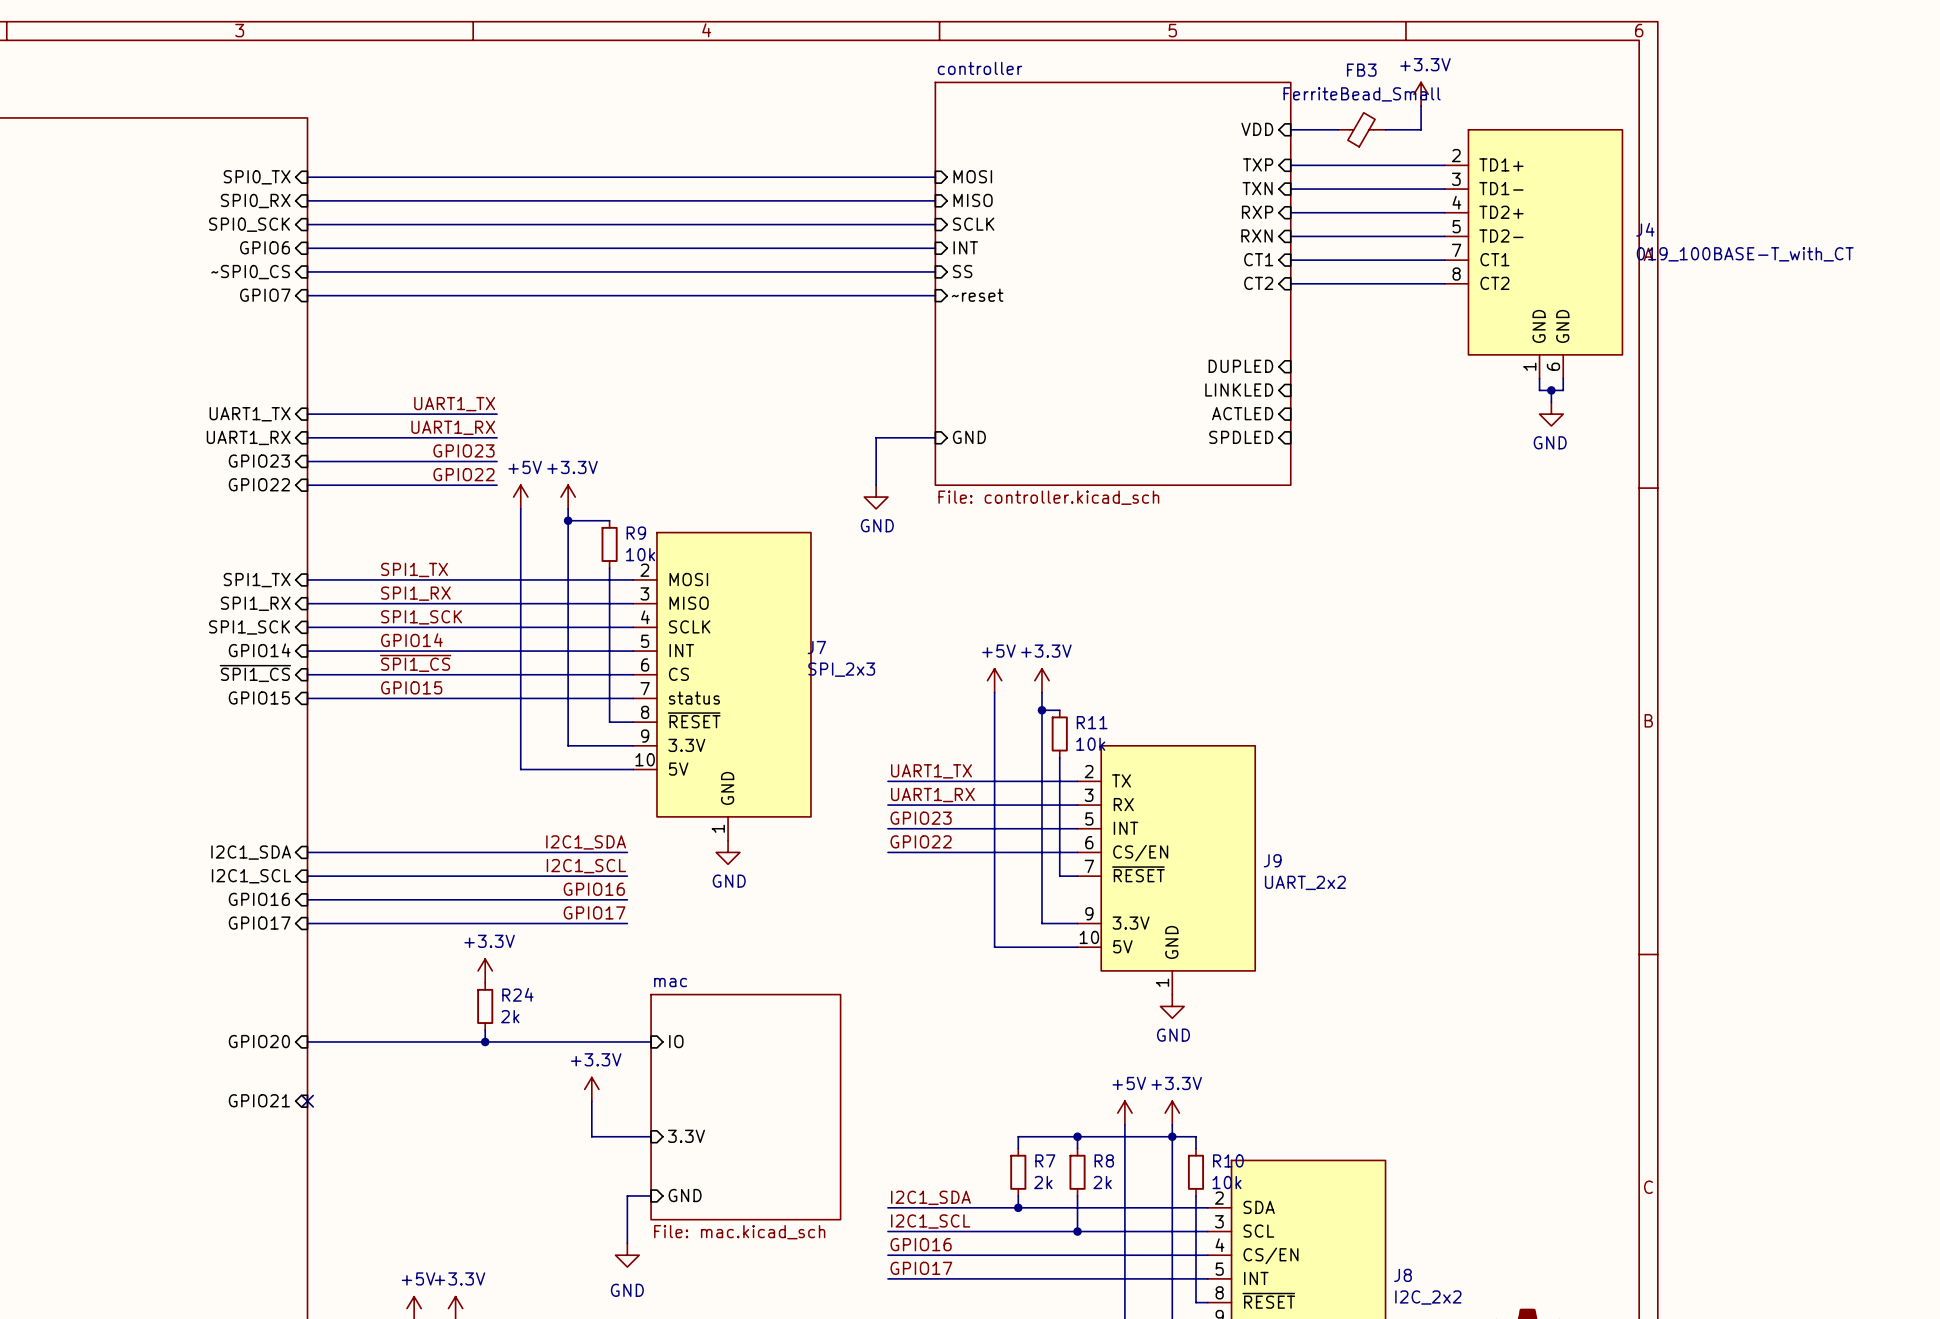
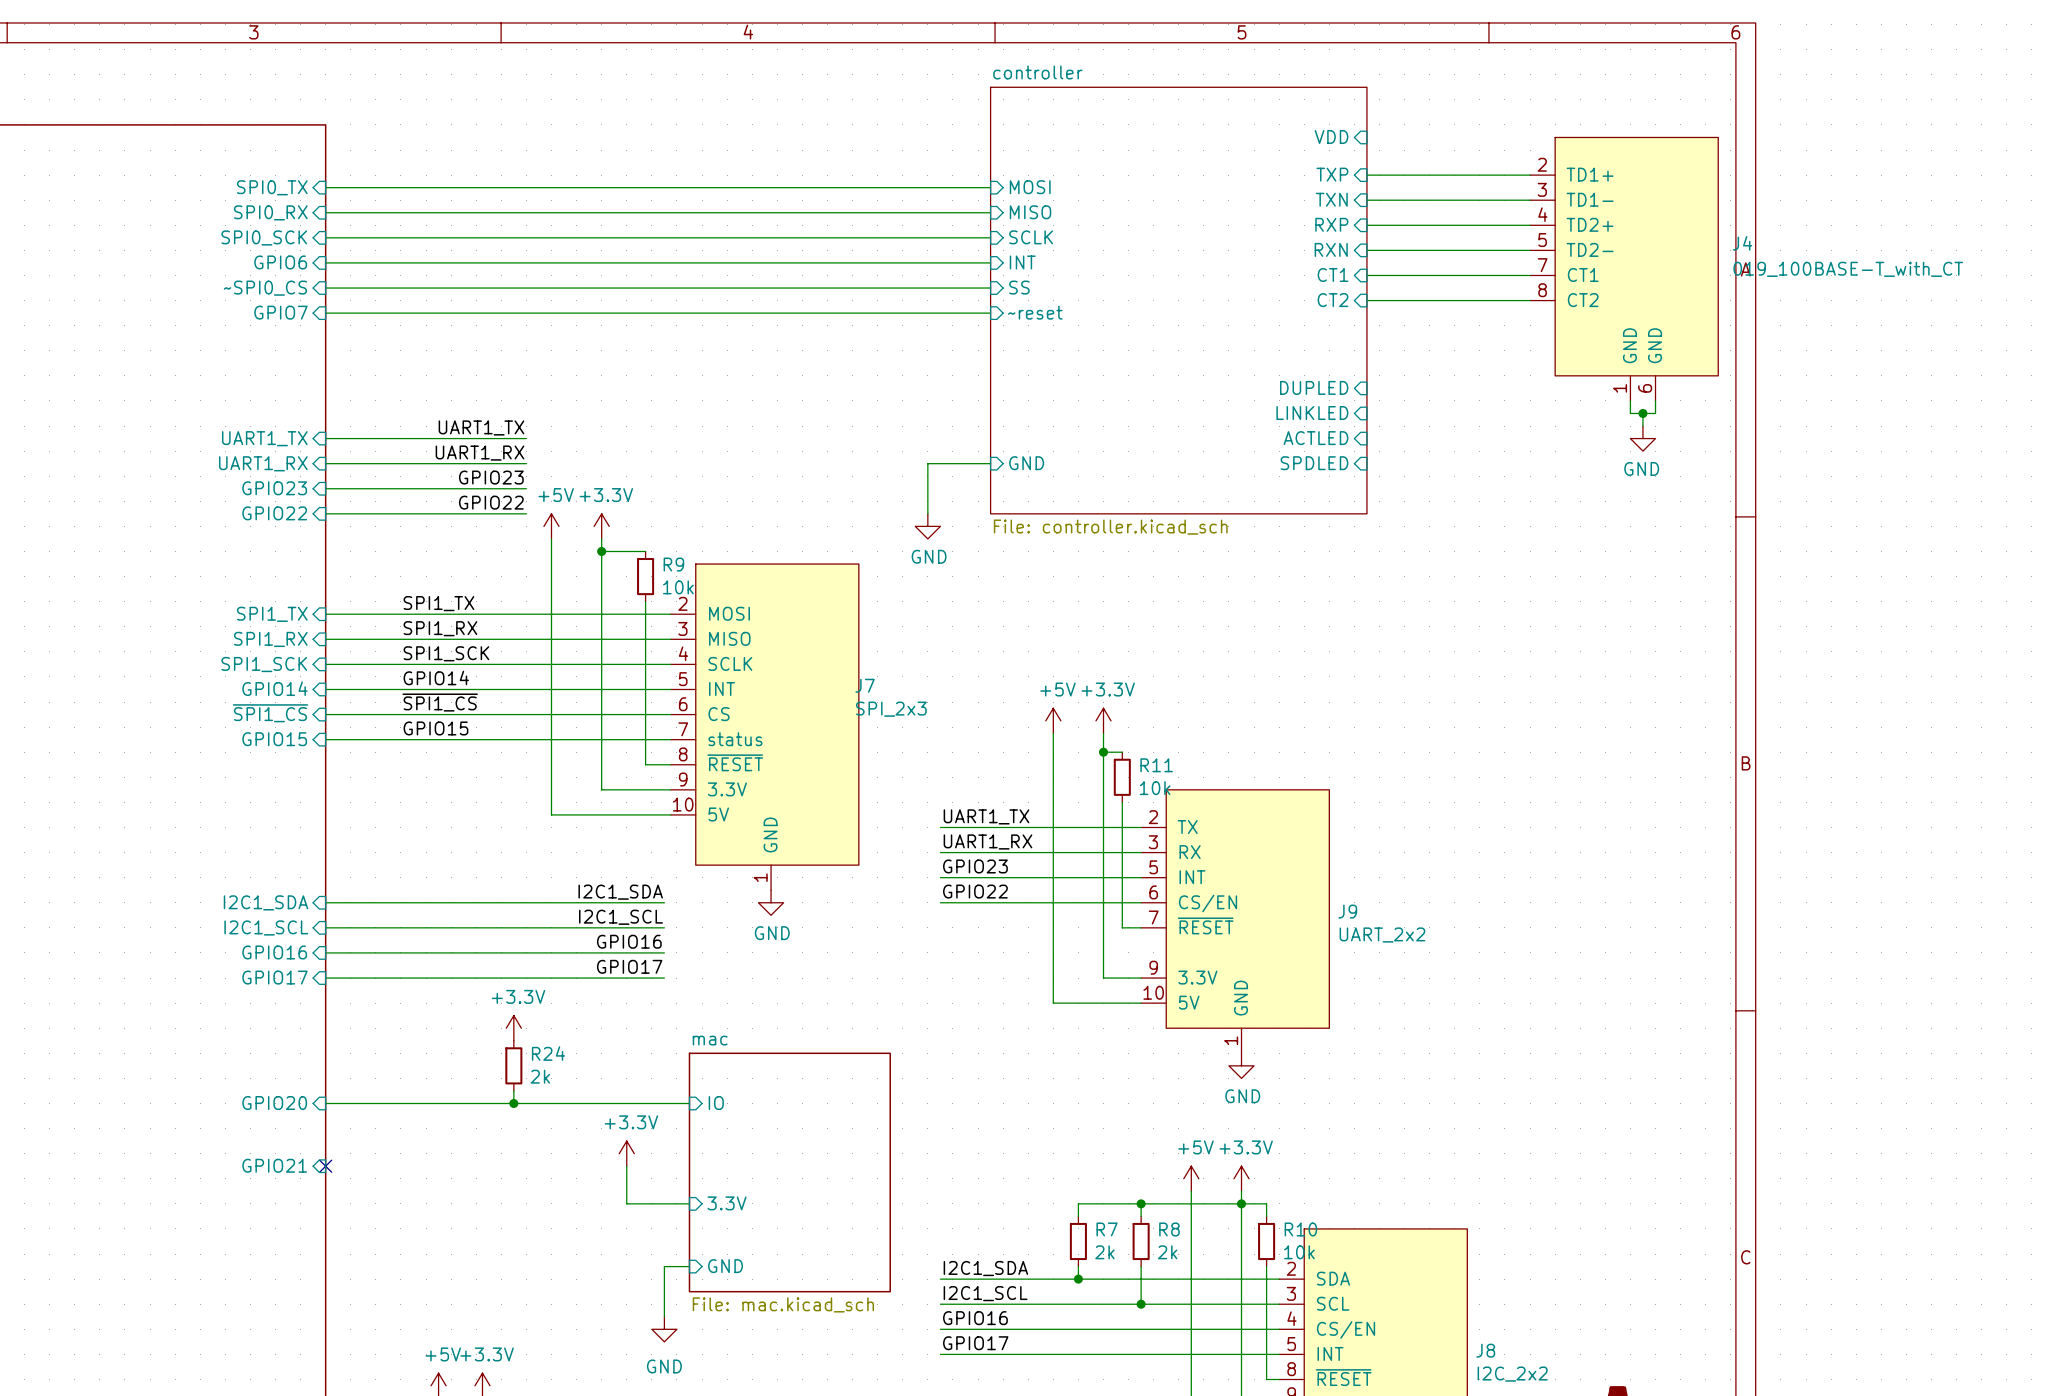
power symbol: +3.3V (1421, 94) -> none
wire: (1421, 106) (1421, 129) (1385, 129) -> none
wire: (1290, 129) (1338, 129) -> none
FB3: FerriteBead_Small (1361, 129) -> none

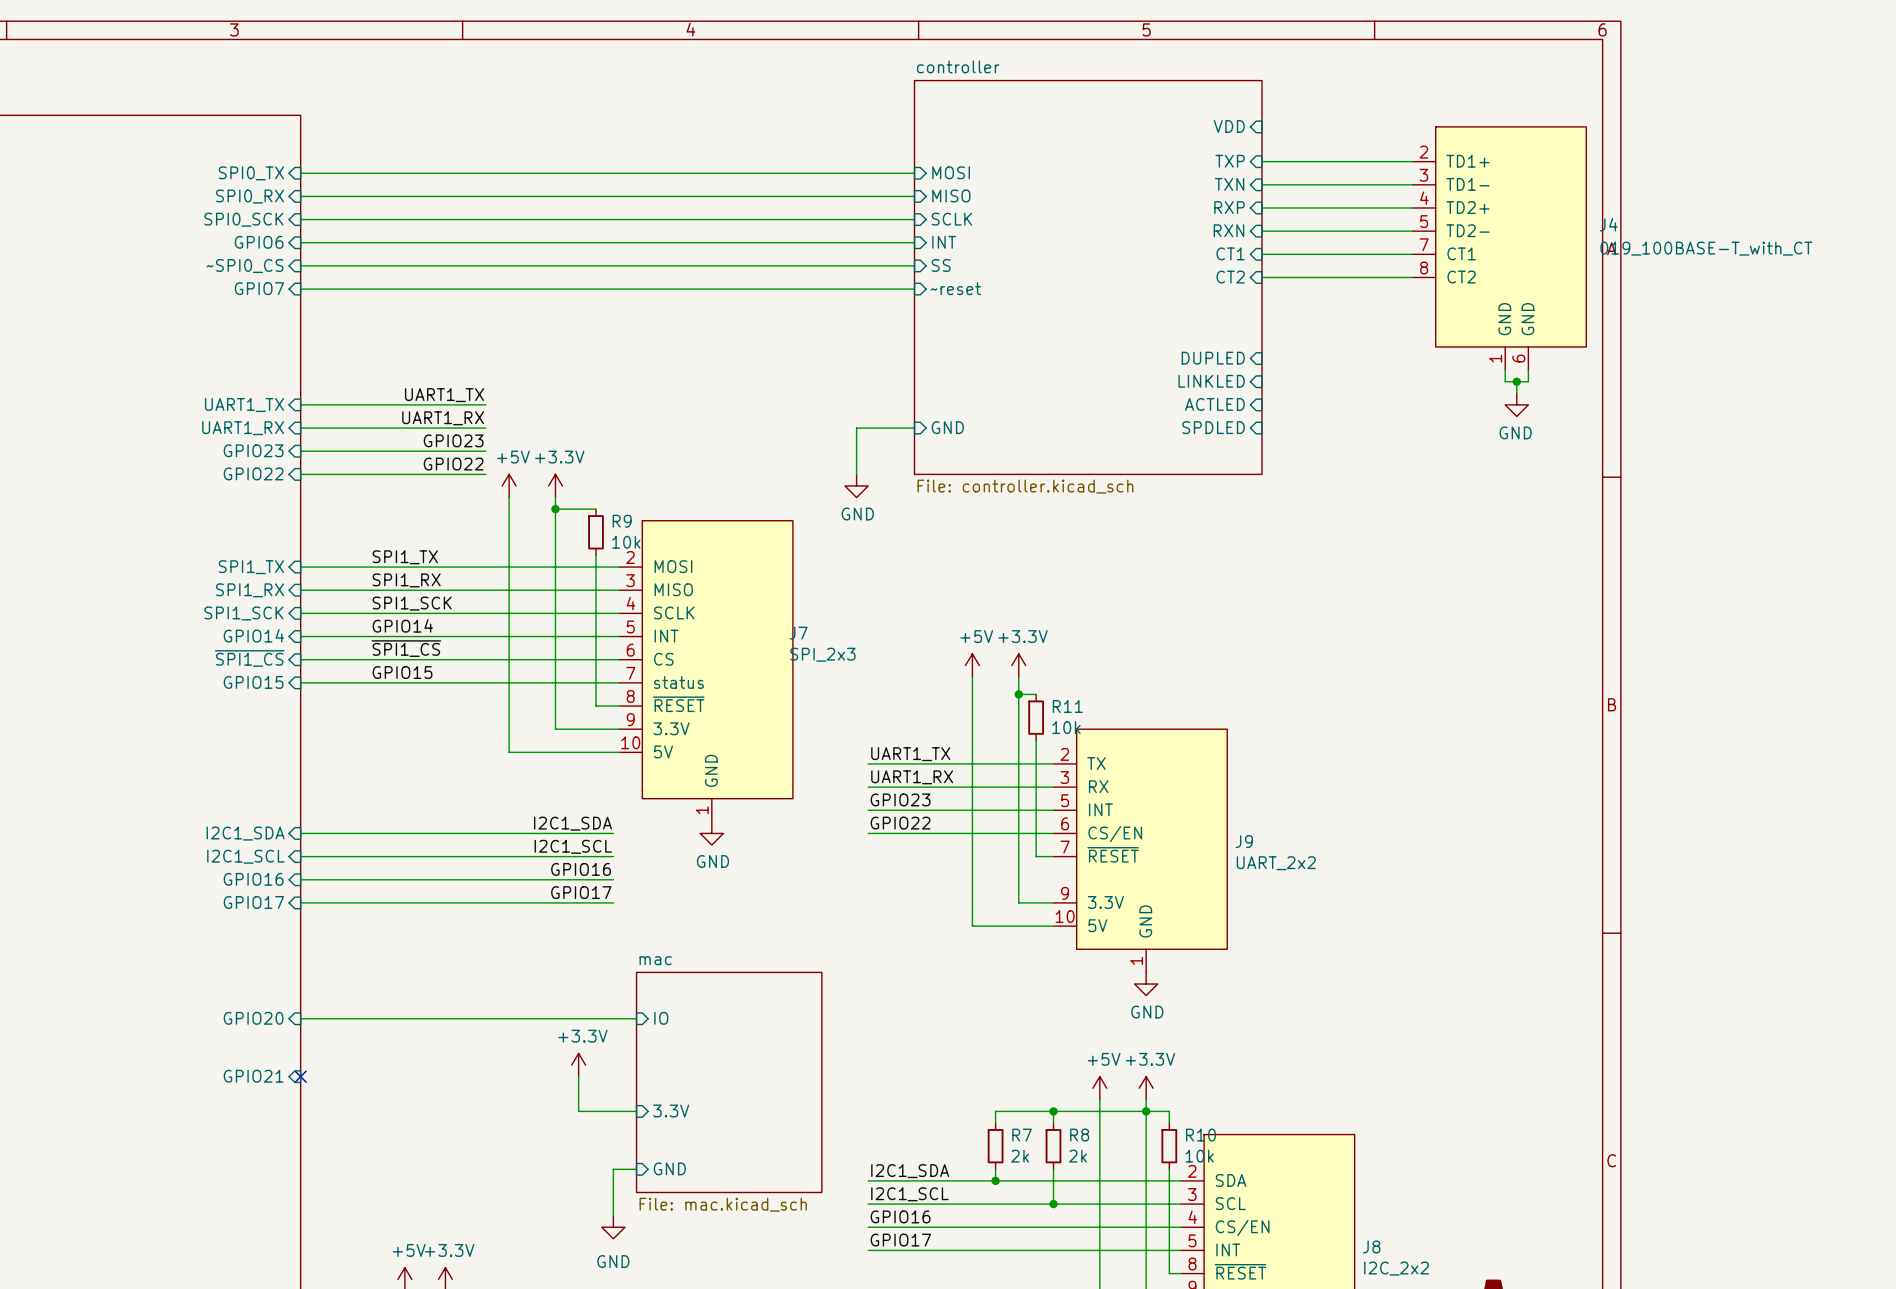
power symbol: +3.3V (513, 1028) -> none
R24: 2k (513, 1065) -> none
wire: (513, 1090) (513, 1103) -> none
junction: (513, 1103) -> none

